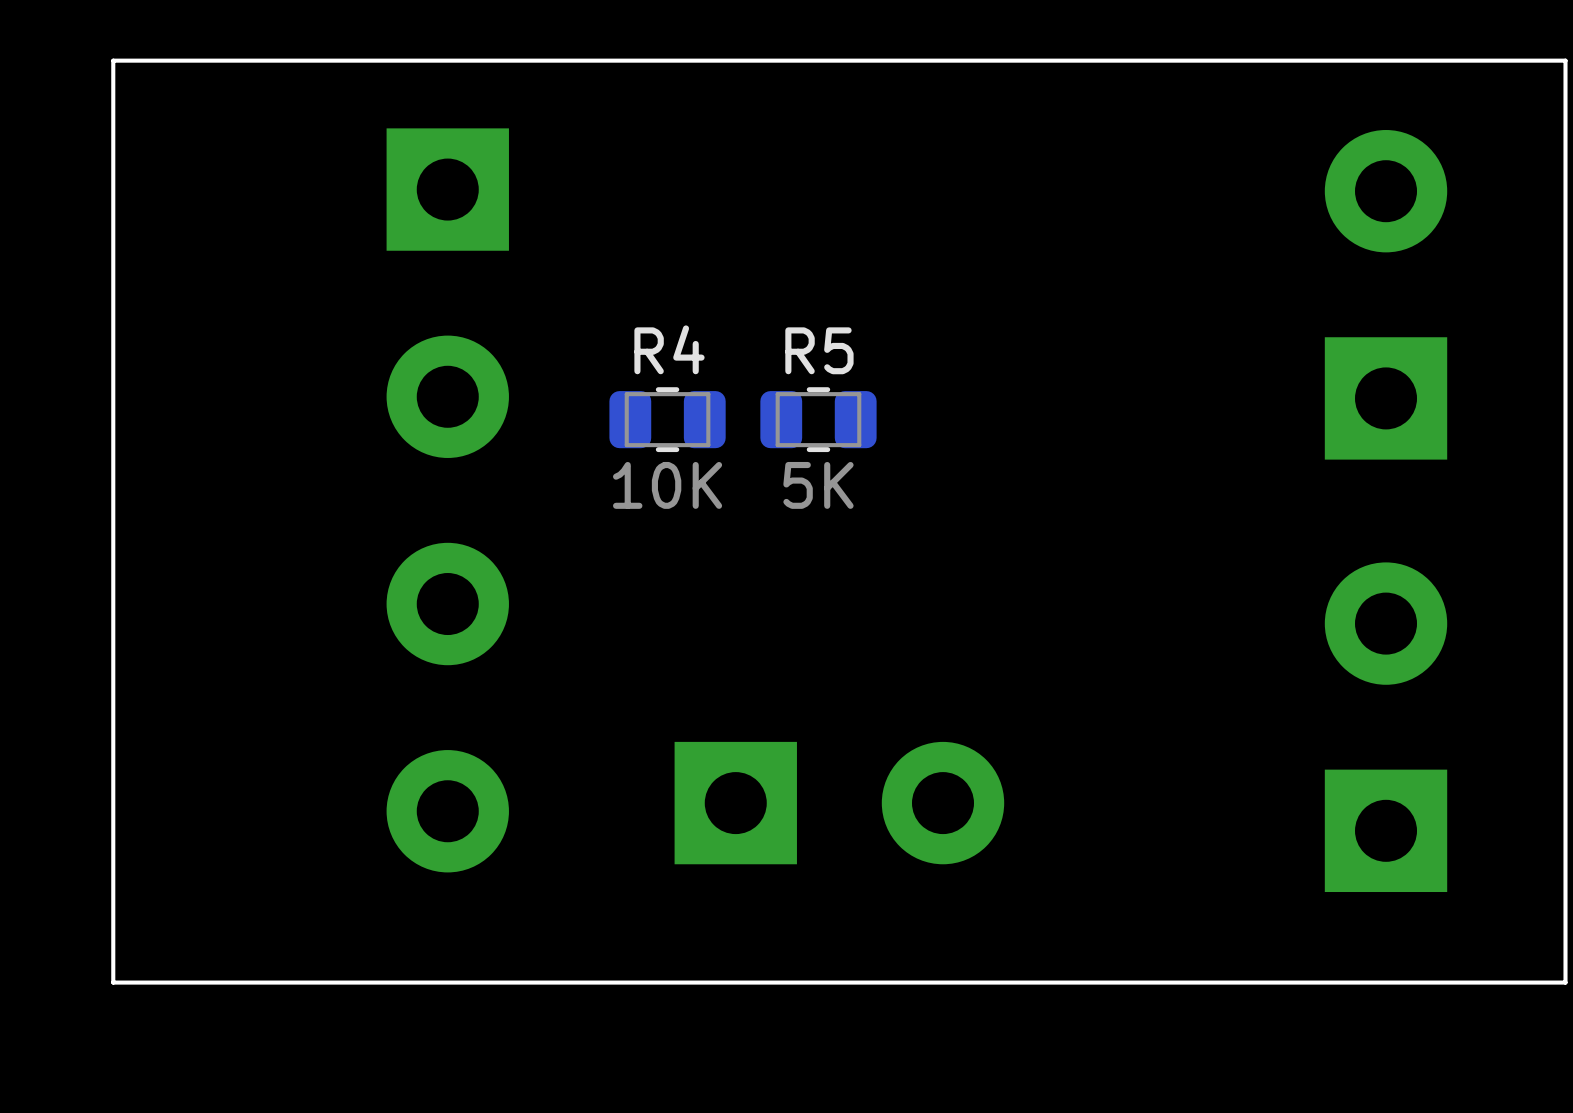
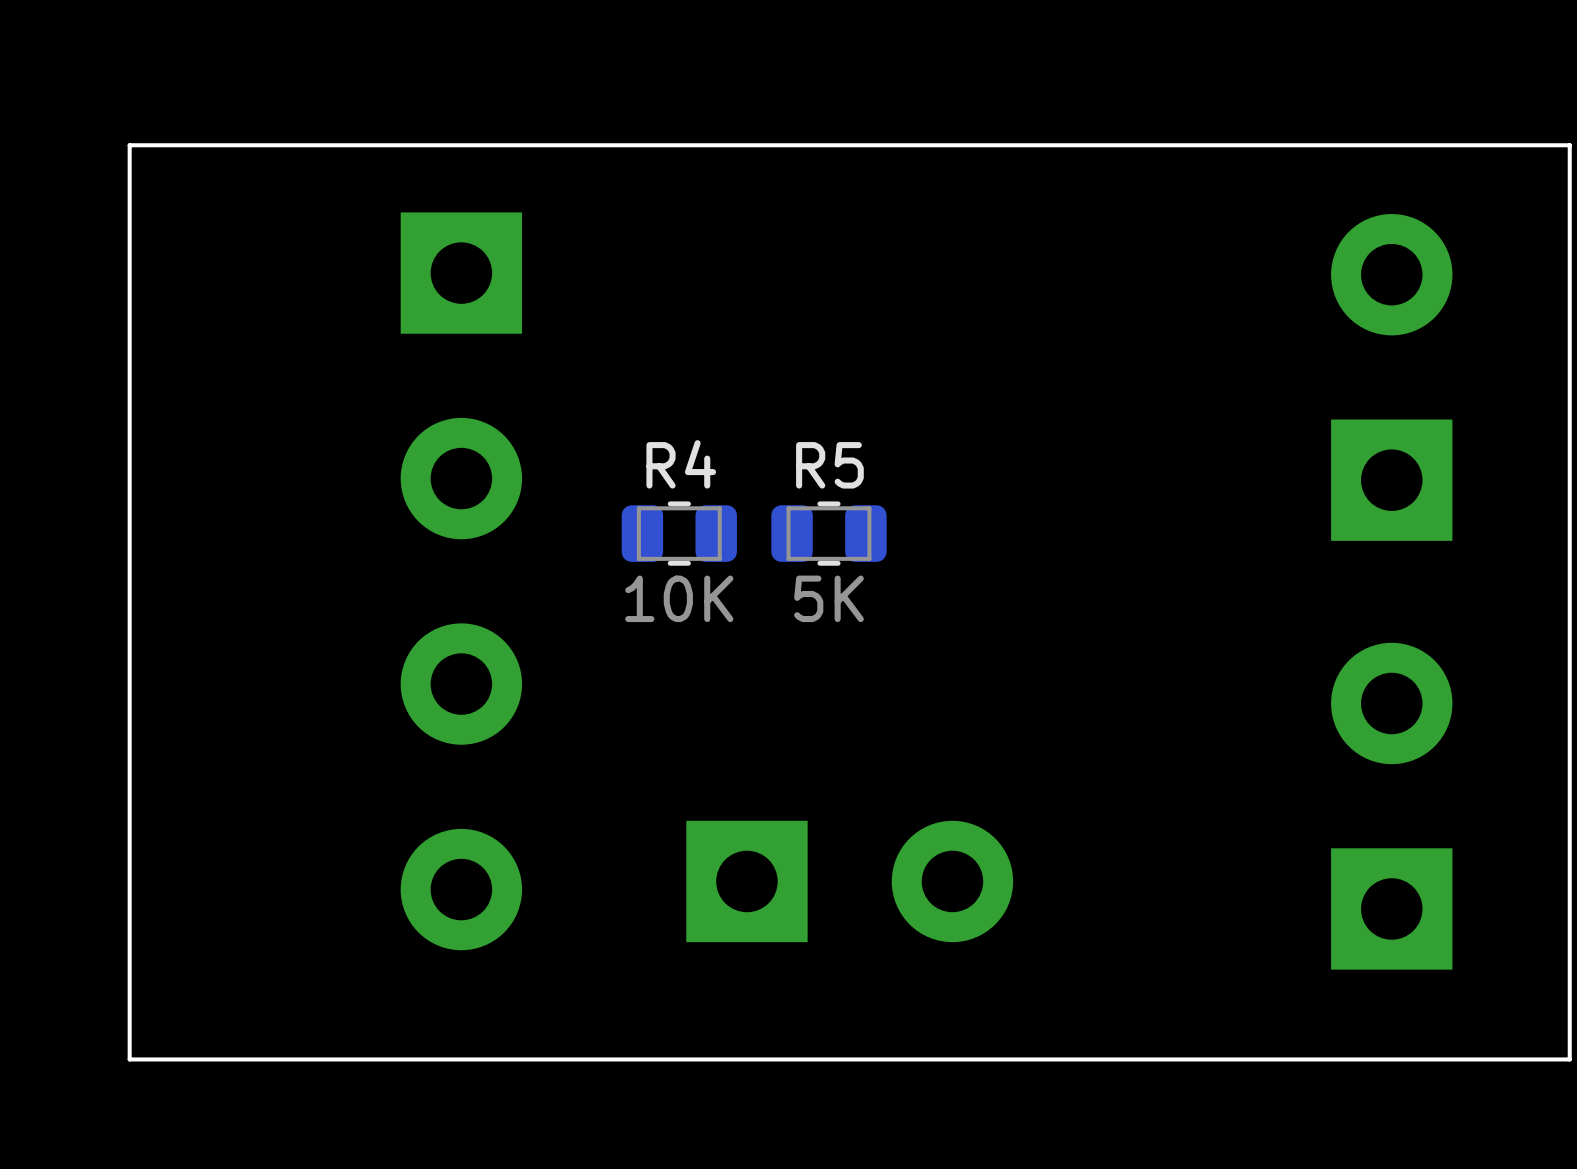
R4 position: (667, 419) -> (679, 533)
R5 position: (818, 419) -> (828, 533)

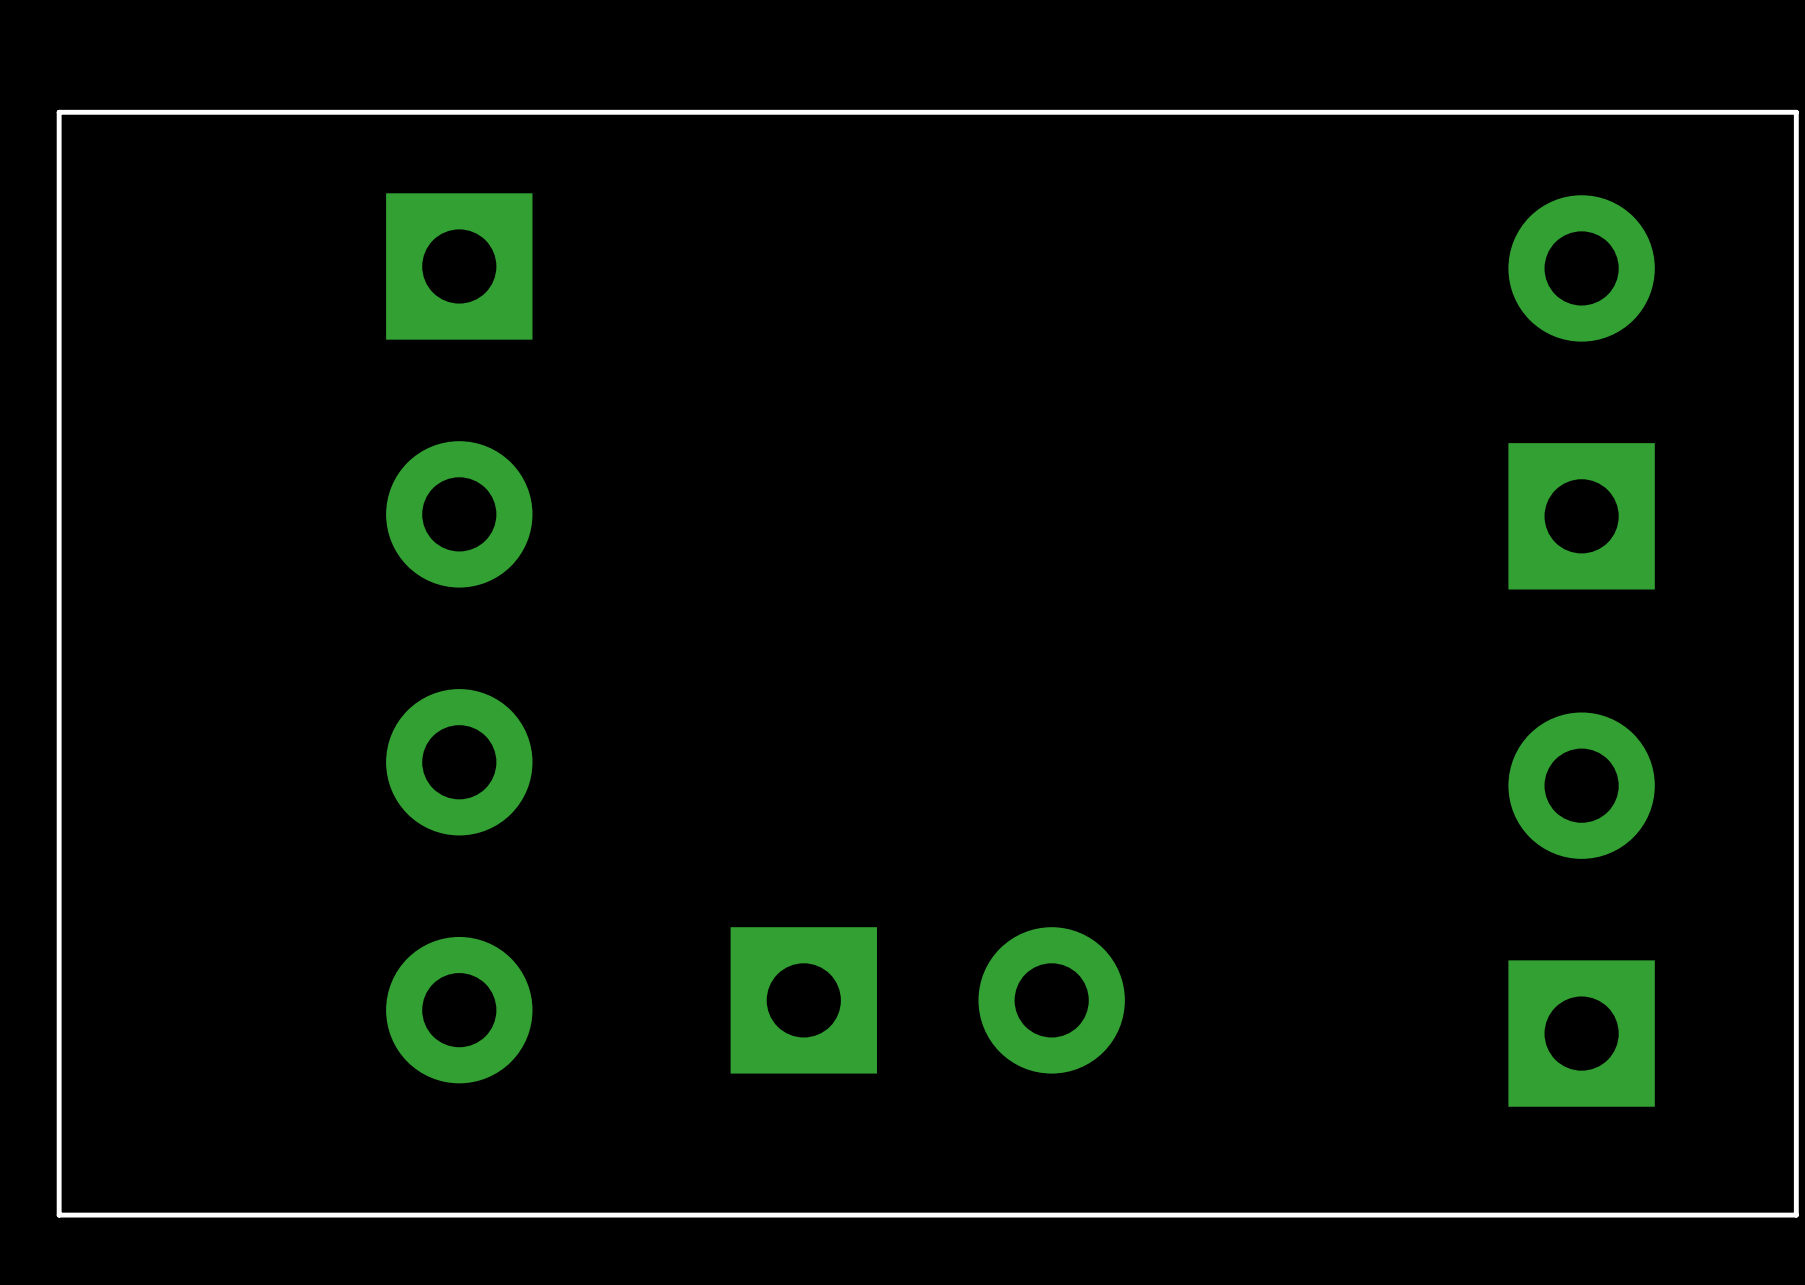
R4: 10K (679, 533) -> none
R5: 5K (828, 533) -> none

